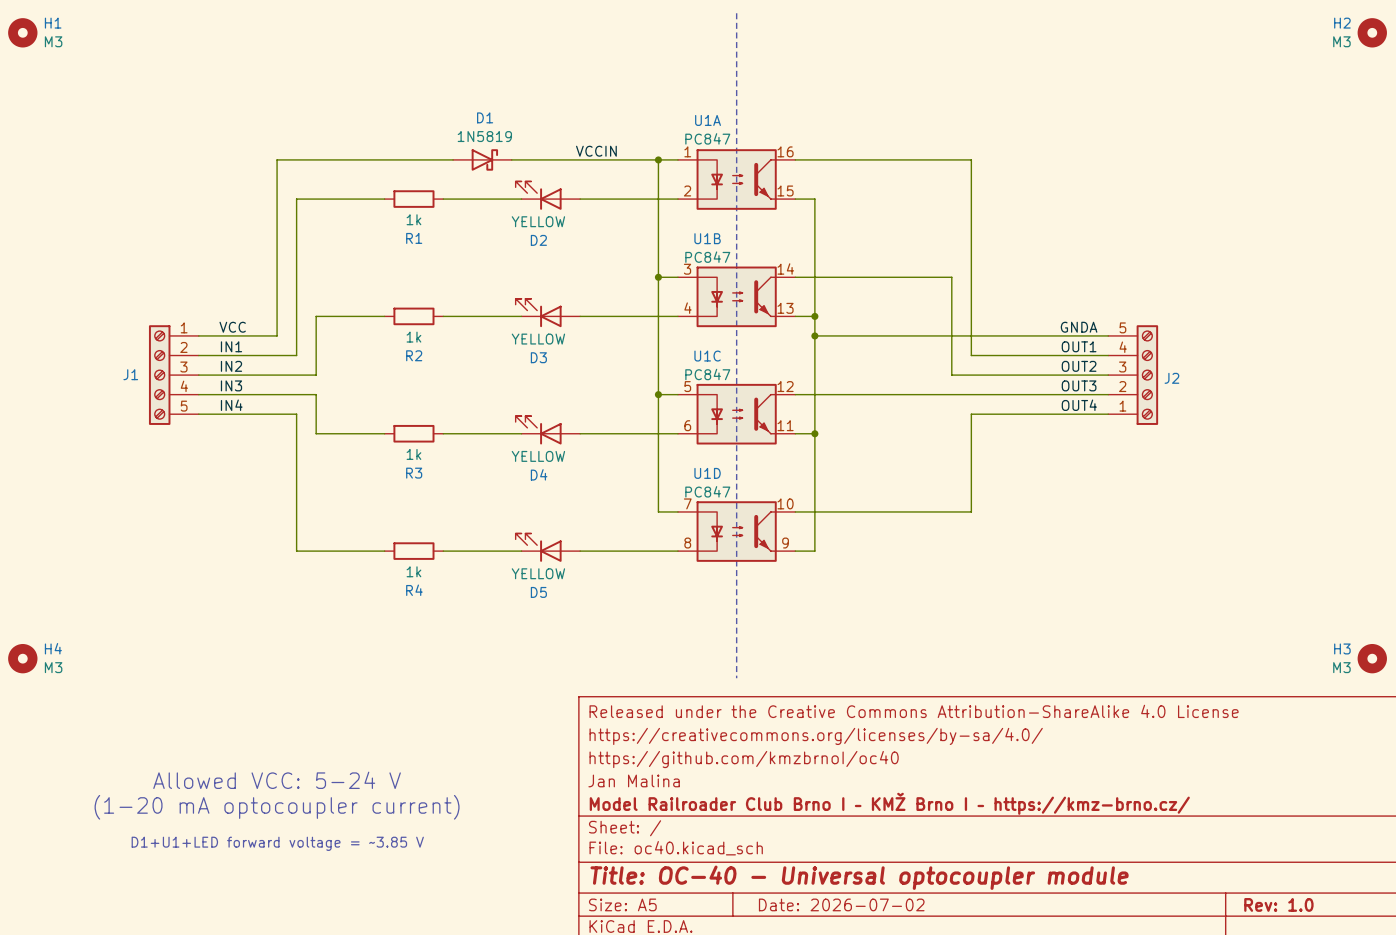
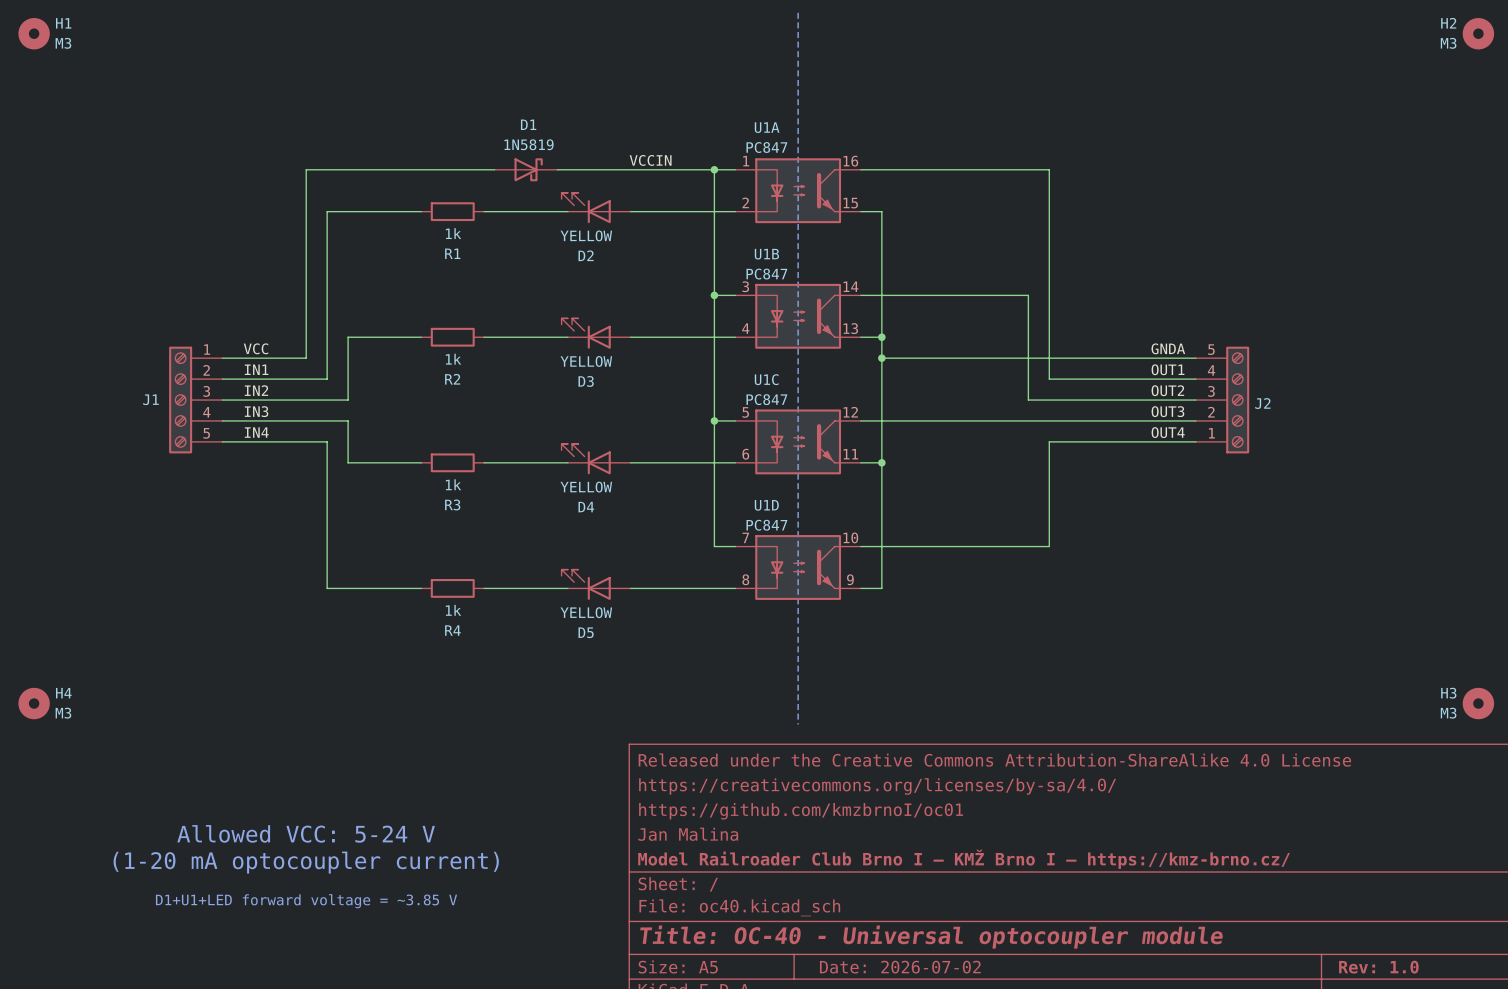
title block: https://github.com/kmzbrnoI/oc40 (744, 759) -> https://github.com/kmzbrnoI/oc01 (801, 811)

